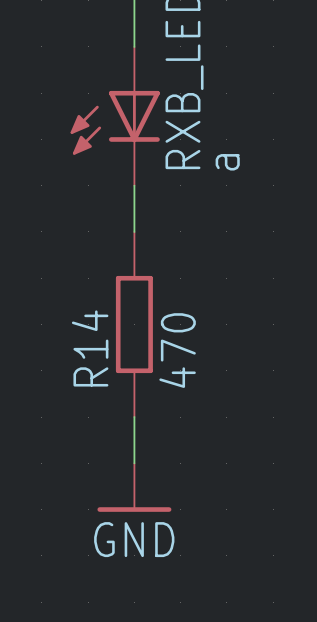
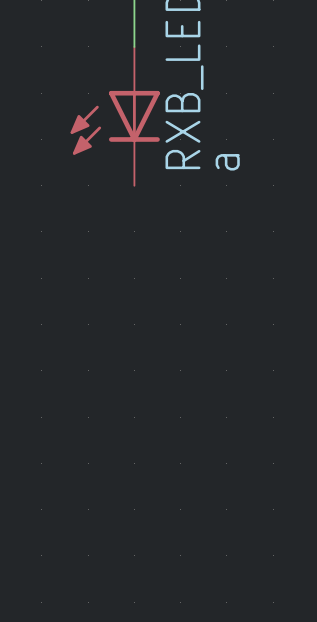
wire: (134, 185) (134, 231) -> none
R14: 470 (134, 324) -> none
wire: (134, 417) (134, 463) -> none
power symbol: GND (134, 487) -> none

